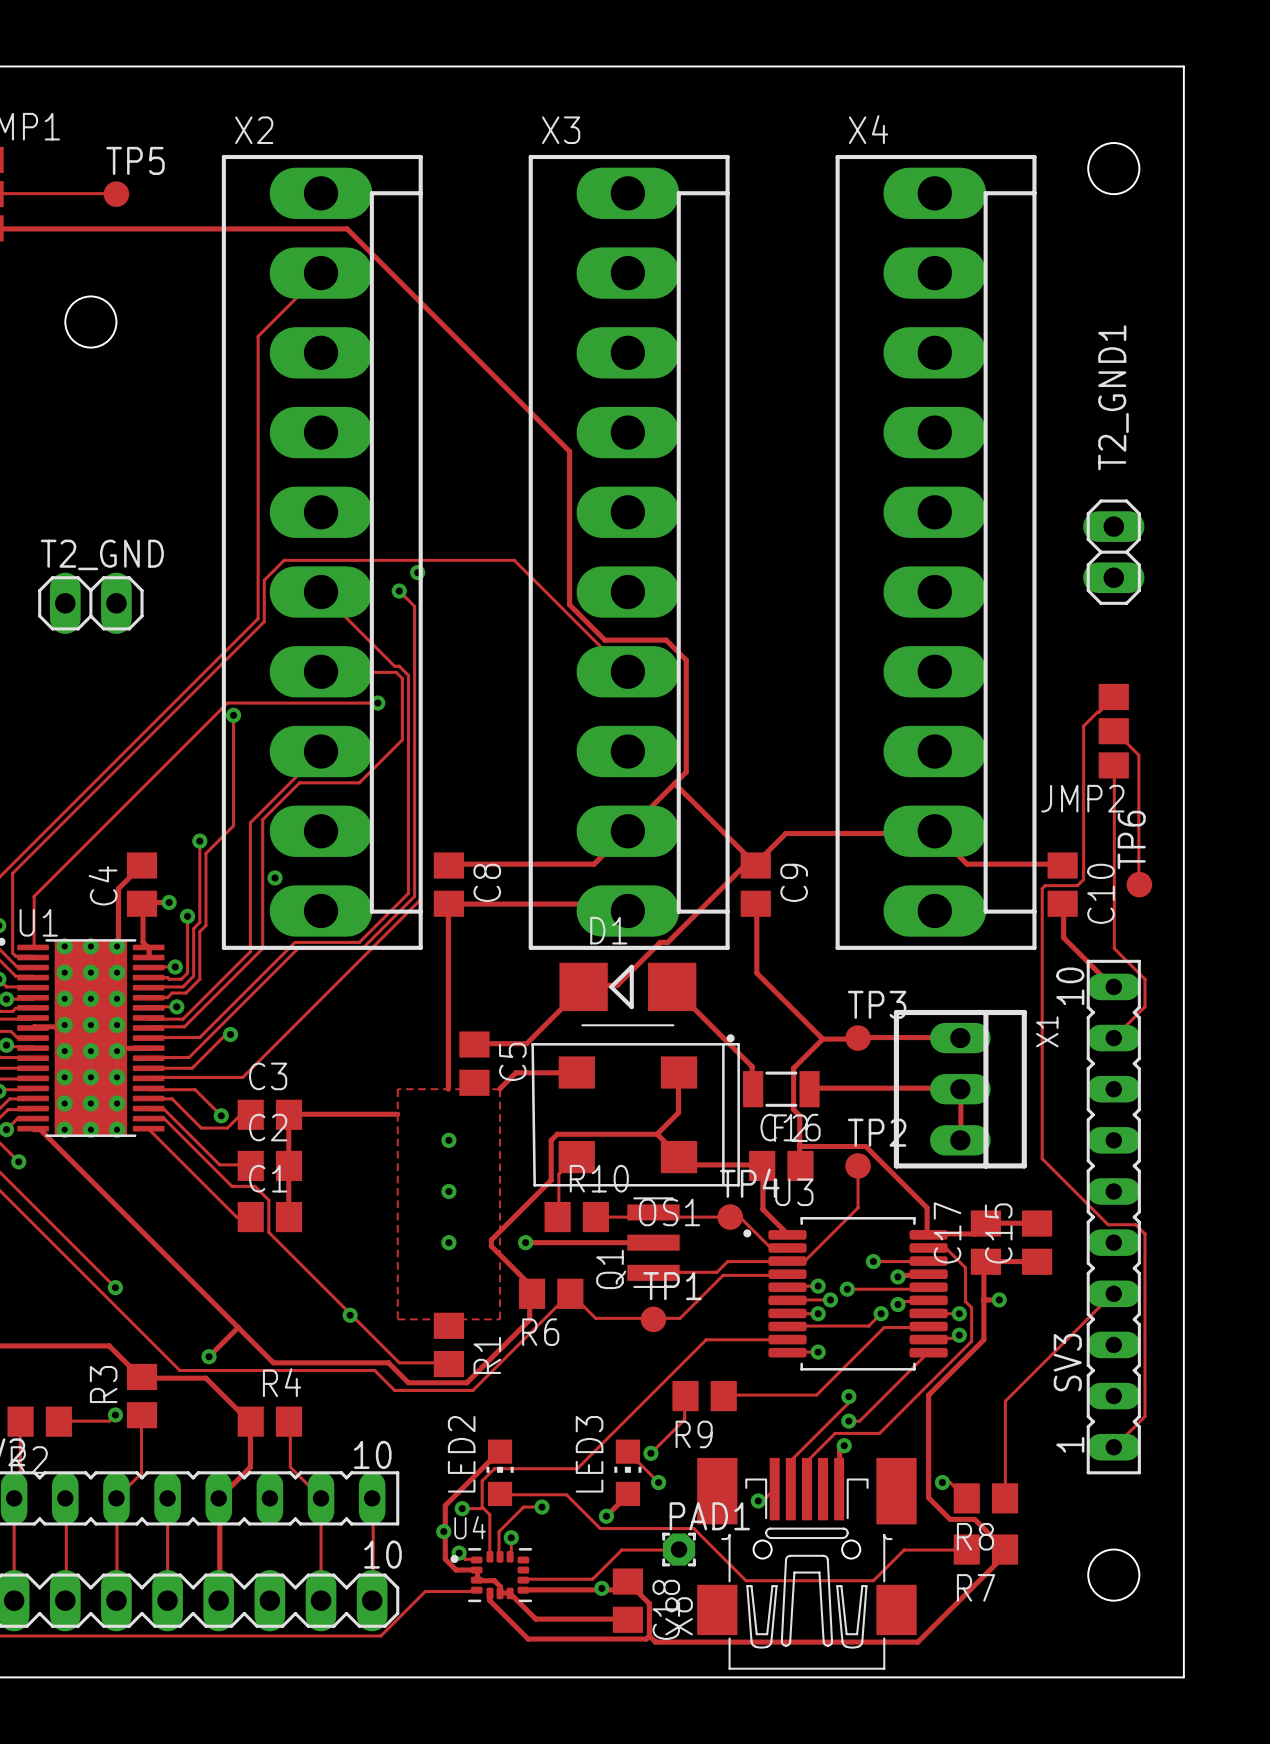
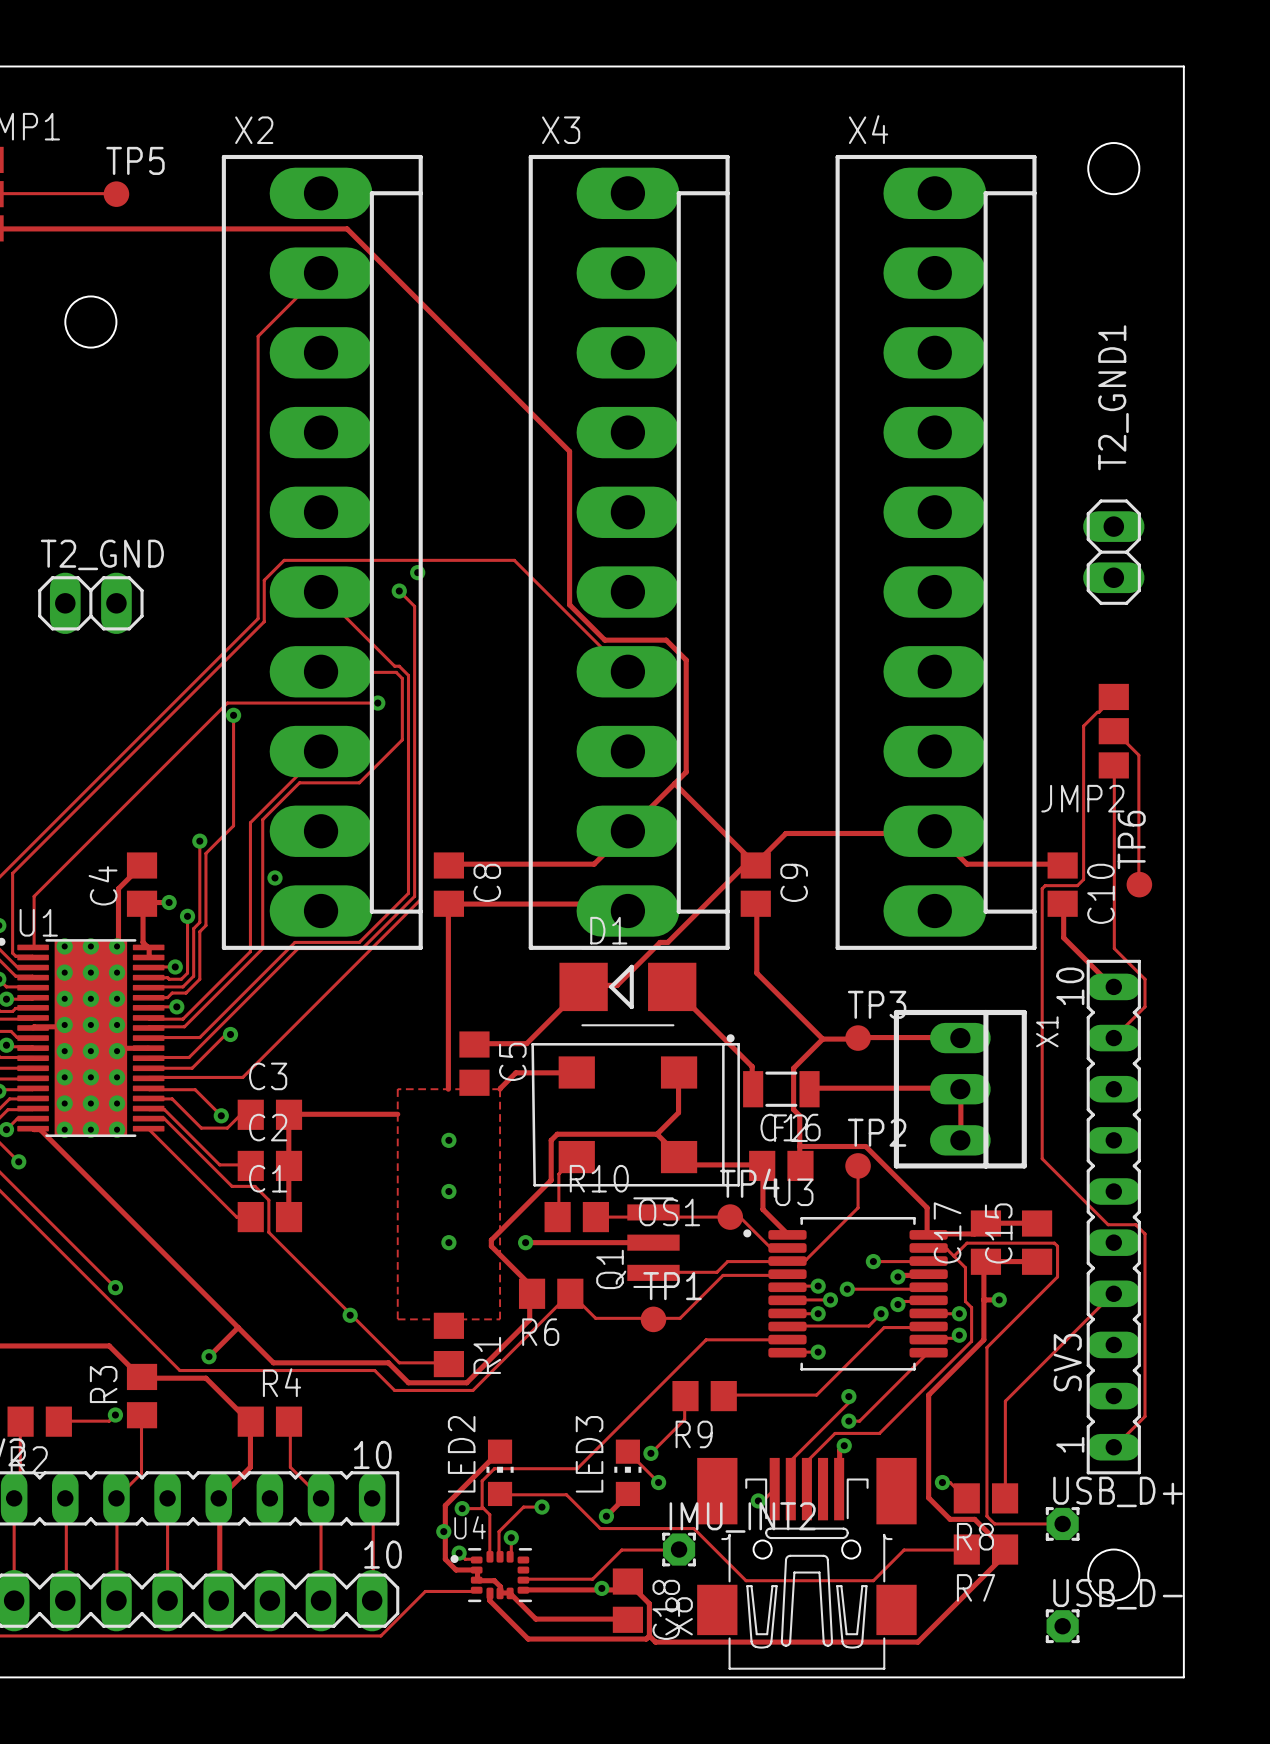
track: none -> (953, 1256) (967, 1243) (1054, 1243) (1057, 1246) (1057, 1276) (986, 1347) (986, 1516) (994, 1523) (1062, 1523)
PAD1 name: PAD1 (709, 1516) -> IMU_INT2 (742, 1517)
USB_D+: none -> (1062, 1523)
USB_D-: none -> (1062, 1626)

